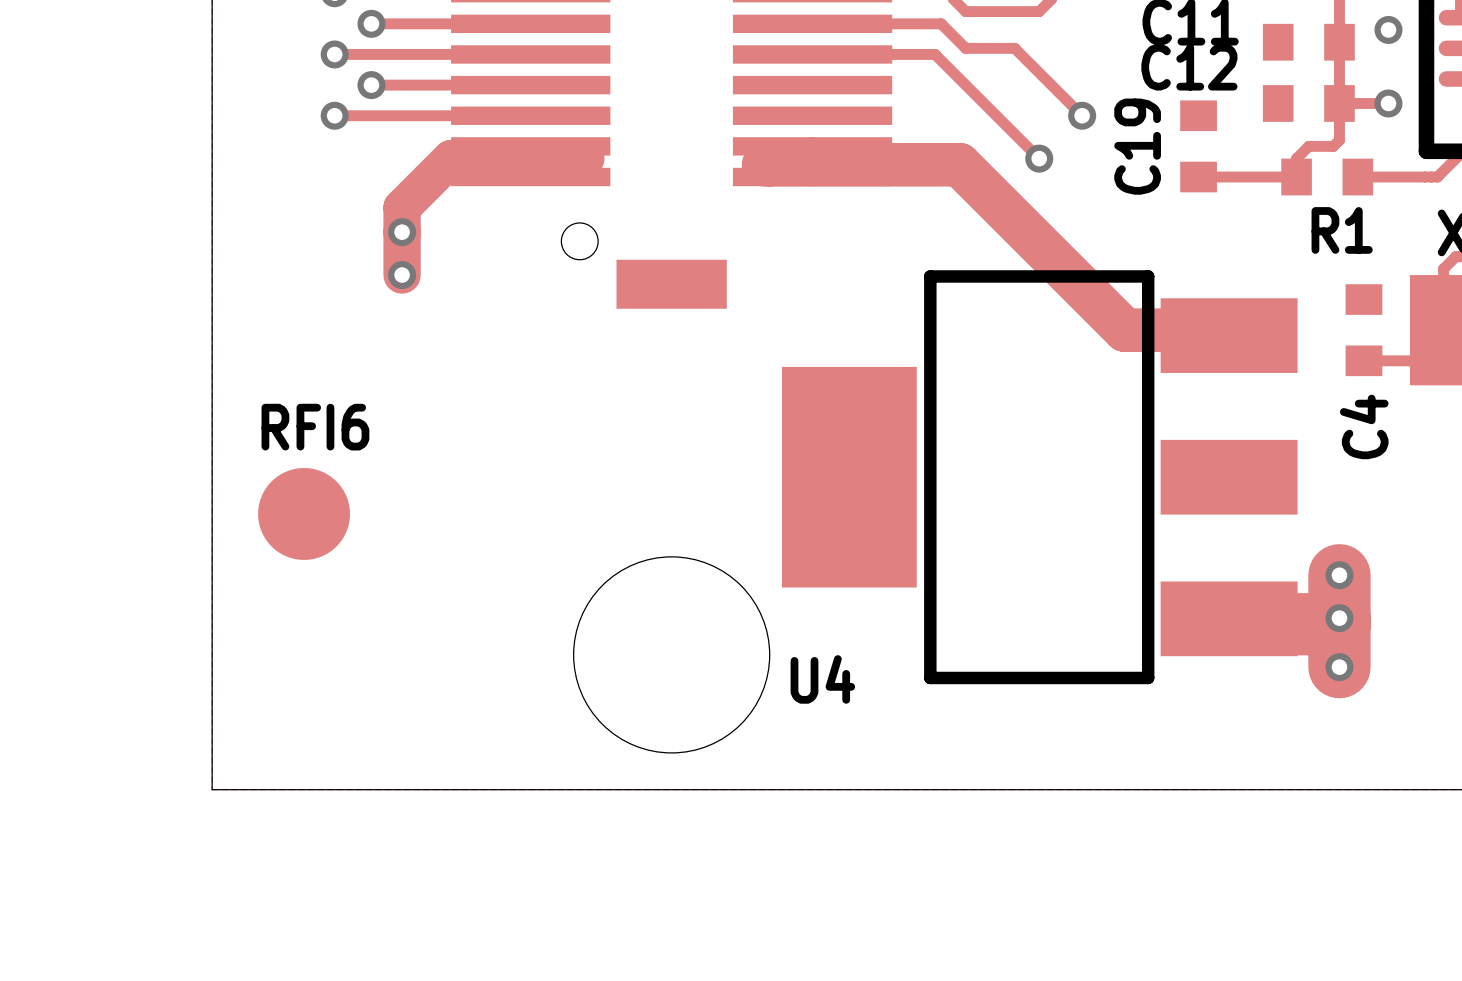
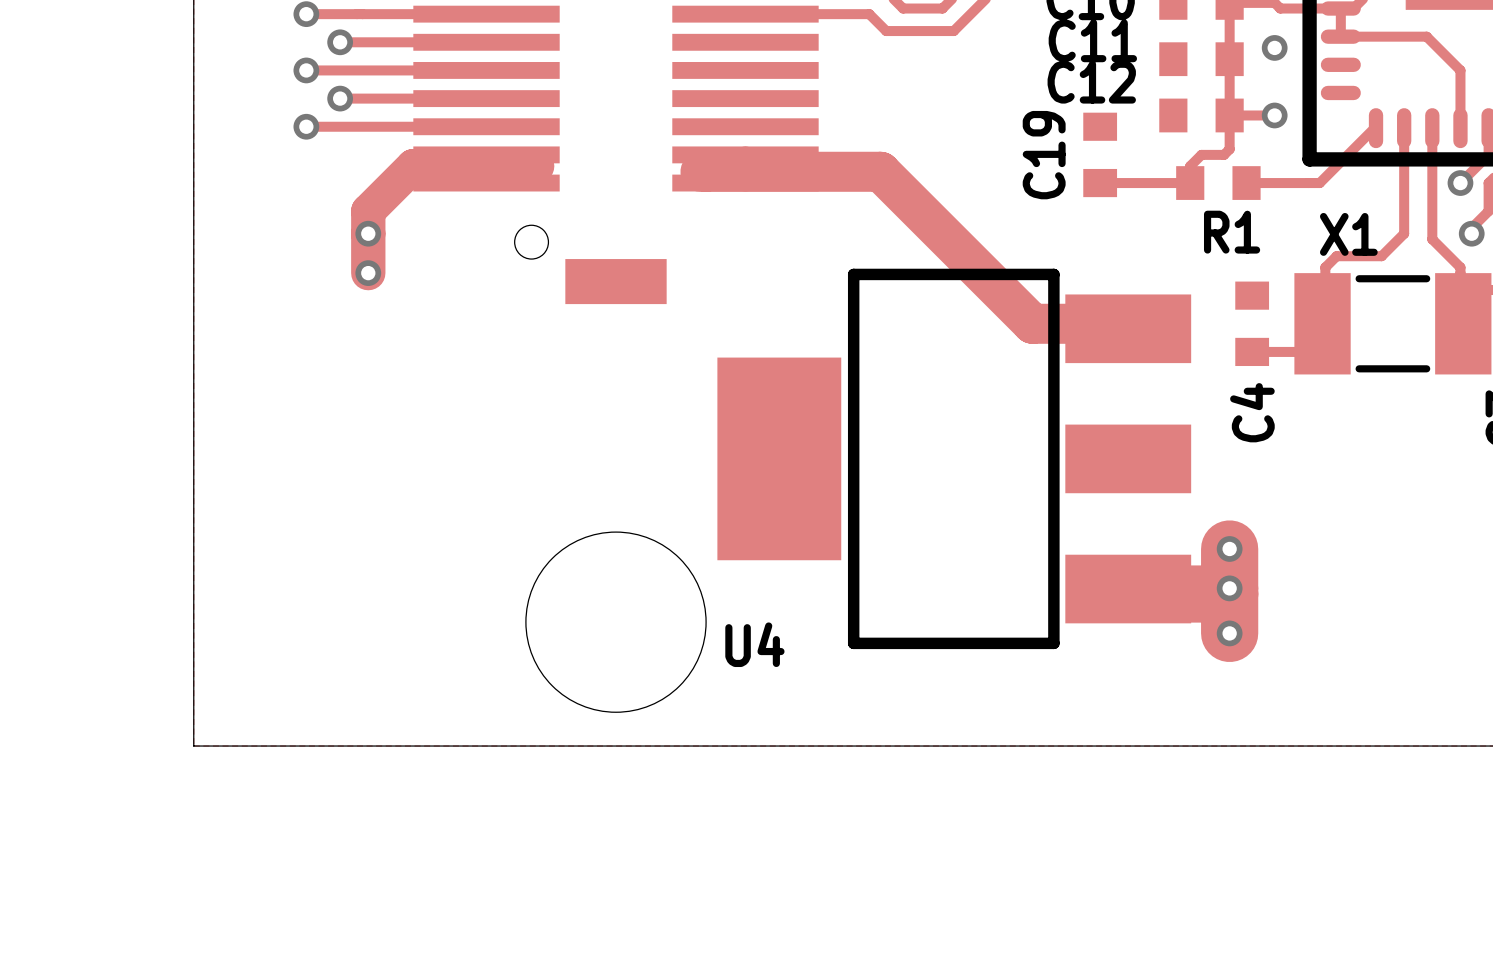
track: (812, 23) (941, 23) (965, 48) (1014, 48) (1082, 115) -> none
track: (812, 54) (935, 54) (1039, 158) -> none
via: (1082, 115) -> none
via: (1039, 158) -> none
RFI6: (304, 513) -> none

